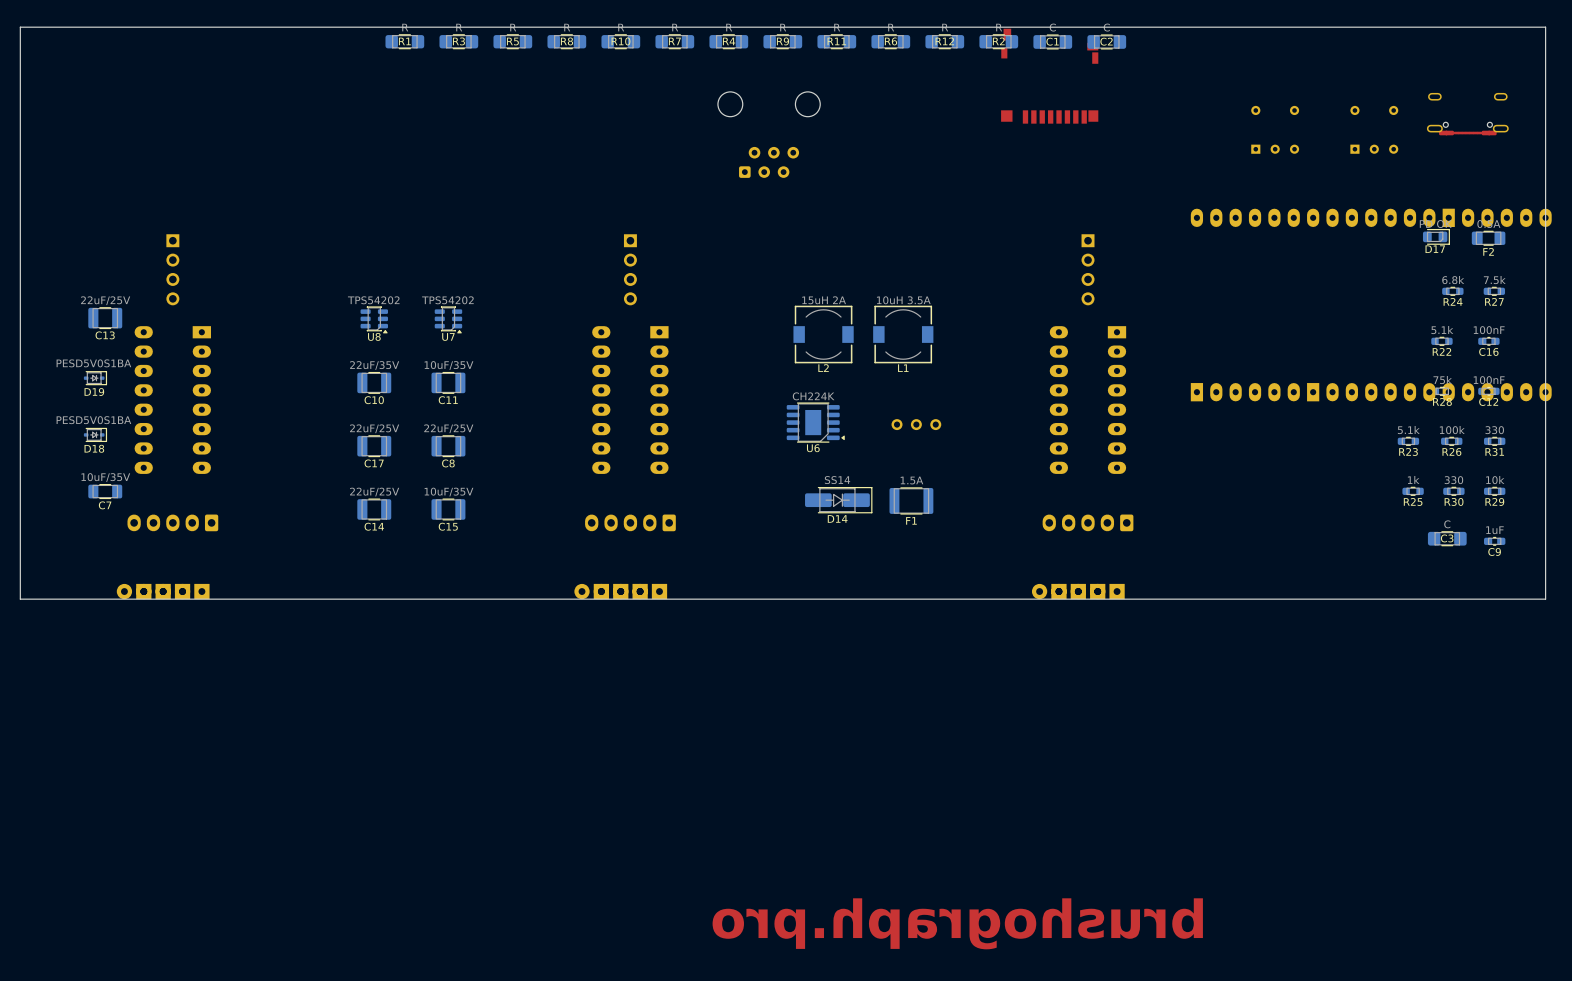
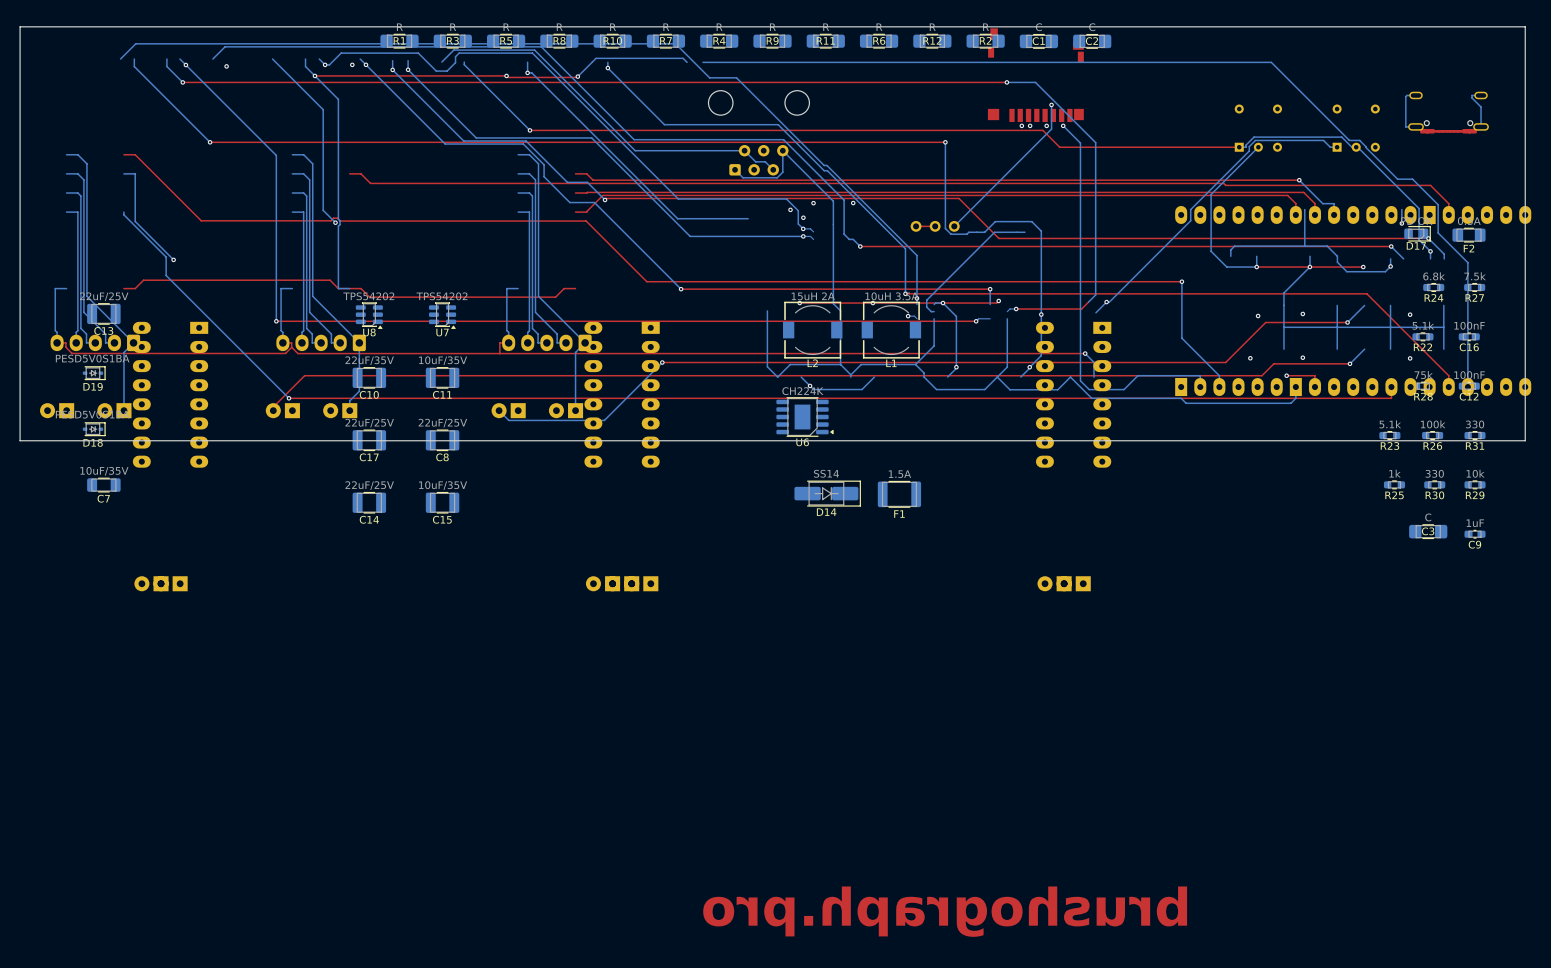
bottom track: none -> (120, 59) (135, 43) (675, 43) (709, 77) (736, 77) (916, 255) (916, 304)
bottom track: none -> (134, 59) (134, 66) (210, 142)
bottom track: none -> (166, 59) (166, 66) (182, 82)
bottom track: none -> (179, 59) (276, 155) (276, 321)
bottom track: none -> (212, 59) (225, 46) (541, 46) (634, 139) (783, 139) (844, 200) (844, 234) (860, 246)
bottom track: none -> (272, 59) (323, 109) (323, 210) (335, 222)
bottom track: none -> (305, 59) (305, 66) (338, 99) (338, 219) (340, 220) (338, 226) (338, 288) (349, 288)
bottom track: none -> (319, 59) (325, 64) (329, 64) (341, 53) (418, 53) (436, 71) (447, 71) (455, 62) (455, 56) (459, 53) (532, 53) (678, 198) (786, 198) (798, 210) (798, 223) (803, 228) (810, 228) (813, 231)
bottom track: none -> (360, 59) (445, 144) (523, 144) (544, 164) (544, 176) (569, 202) (594, 202) (681, 289)
bottom track: none -> (392, 60) (392, 69) (463, 141) (526, 141) (567, 182) (587, 182) (605, 199)
bottom track: none -> (408, 60) (408, 69) (476, 137) (591, 137) (690, 236) (810, 236) (813, 239)
bottom track: none -> (441, 62) (453, 50) (534, 50) (635, 150) (744, 150) (755, 161) (765, 161) (773, 169)
bottom track: none -> (464, 62) (464, 64) (529, 130)
bottom track: none -> (527, 62) (527, 72) (531, 72) (677, 218) (748, 218)
bottom track: none -> (607, 62) (607, 68) (664, 124) (778, 124) (905, 248) (905, 293)
bottom track: none -> (687, 62) (683, 58) (596, 58) (577, 76)
bottom track: none -> (702, 62) (1271, 62) (1349, 140) (1359, 140) (1397, 179) (1412, 179) (1438, 204) (1438, 232) (1467, 262) (1467, 387)
via: none -> (185, 65)
via: none -> (325, 64)
via: none -> (352, 64)
via: none -> (366, 64)
via: none -> (226, 66)
via: none -> (607, 68)
via: none -> (392, 69)
via: none -> (408, 69)
via: none -> (527, 72)
top track: none -> (314, 75) (577, 76)
via: none -> (314, 75)
via: none -> (506, 75)
via: none -> (577, 76)
via: none -> (182, 82)
bottom track: none -> (1006, 82) (1035, 82) (1095, 142) (1095, 294) (1088, 302)
top track: none -> (1006, 82) (182, 82)
via: none -> (1006, 82)
bottom track: none -> (1416, 95) (1405, 96) (1405, 126) (1416, 126)
bottom track: none -> (1481, 95) (1471, 95) (1471, 97) (1481, 107) (1481, 126)
bottom track: none -> (1051, 104) (1051, 129) (954, 226)
via: none -> (1051, 104)
via: none -> (1021, 125)
via: none -> (1030, 125)
via: none -> (1046, 125)
bottom track: none -> (1063, 125) (1080, 143) (1080, 380) (1089, 389) (1124, 389) (1137, 375) (1200, 375) (1200, 387)
via: none -> (1063, 125)
top track: none -> (529, 130) (1042, 130) (1059, 147) (1239, 147)
via: none -> (529, 130)
via: none -> (210, 142)
bottom track: none -> (945, 142) (945, 228) (951, 234) (984, 232) (995, 221) (1031, 221) (1041, 231) (1041, 355) (1020, 377)
top track: none -> (945, 142) (210, 142)
via: none -> (945, 142)
bottom track: none -> (1239, 147) (1246, 147) (1254, 137) (1341, 137) (1351, 147) (1357, 147) (1419, 208) (1419, 239) (1430, 251) (1430, 258)
bottom track: none -> (1258, 147) (1211, 194) (1211, 251) (1226, 267) (1256, 267) (1256, 256)
bottom track: none -> (1337, 147) (1330, 147) (1323, 140) (1255, 140) (1249, 146) (1249, 150) (1190, 209) (1190, 220) (1109, 302) (1106, 302) (1095, 312)
bottom track: none -> (66, 154) (77, 154) (86, 163) (86, 296) (133, 342) (124, 352) (124, 410)
top track: none -> (123, 154) (135, 154) (201, 220) (330, 220) (337, 218) (340, 221) (586, 221) (646, 281) (1181, 281)
bottom track: none -> (292, 154) (303, 154) (312, 163) (312, 296) (359, 342) (359, 391) (349, 400) (349, 410)
bottom track: none -> (518, 154) (529, 154) (538, 163) (538, 296) (585, 342) (575, 352) (575, 410)
bottom track: none -> (735, 169) (743, 177) (777, 177) (782, 172) (782, 150) (833, 201) (833, 303) (840, 310) (840, 364)
bottom track: none -> (66, 173) (77, 173) (83, 179) (83, 312) (105, 334) (105, 342) (114, 342)
bottom track: none -> (123, 173) (135, 173) (135, 221) (173, 259)
bottom track: none -> (292, 173) (303, 173) (309, 179) (309, 312) (331, 334) (331, 342) (340, 342)
top track: none -> (349, 173) (361, 173) (370, 183) (1223, 183) (1225, 185) (1430, 185) (1448, 203) (1448, 214)
bottom track: none -> (518, 173) (529, 173) (535, 179) (535, 312) (557, 334) (557, 342) (565, 342)
top track: none -> (575, 173) (586, 173) (593, 180) (1299, 180)
bottom track: none -> (1299, 180) (1322, 203) (1334, 203) (1334, 214)
via: none -> (1299, 180)
bottom track: none -> (66, 193) (77, 193) (80, 196) (80, 328) (86, 334) (86, 342) (95, 342)
bottom track: none -> (292, 193) (303, 193) (306, 196) (306, 328) (312, 334) (312, 342) (321, 342)
bottom track: none -> (518, 193) (529, 193) (532, 196) (532, 328) (538, 334) (538, 342) (546, 342)
top track: none -> (575, 193) (1303, 192) (1314, 203) (1314, 214)
top track: none -> (605, 199) (958, 198) (998, 238) (1428, 238)
via: none -> (605, 199)
via: none -> (813, 203)
via: none -> (853, 203)
via: none -> (790, 209)
bottom track: none -> (1304, 209) (1304, 246)
bottom track: none -> (1401, 209) (1401, 223)
bottom track: none -> (66, 212) (77, 212) (77, 330) (76, 342)
bottom track: none -> (123, 212) (123, 214) (166, 257) (166, 275) (288, 398)
bottom track: none -> (292, 212) (303, 212) (303, 330) (301, 342)
bottom track: none -> (518, 212) (529, 212) (529, 330) (527, 342)
top track: none -> (575, 212) (586, 212) (602, 195) (1287, 195) (1295, 203) (1295, 214)
via: none -> (803, 217)
via: none -> (335, 222)
via: none -> (1401, 223)
top track: none -> (935, 226) (916, 226)
part: none -> (935, 226)
via: none -> (803, 228)
bottom track: none -> (1024, 232) (994, 232) (926, 300) (926, 307) (934, 311)
via: none -> (803, 236)
bottom track: none -> (1428, 238) (1444, 254) (1444, 258)
via: none -> (1428, 238)
via: none -> (860, 246)
bottom track: none -> (1391, 246) (1403, 258)
top track: none -> (1391, 246) (860, 246)
via: none -> (1391, 246)
via: none -> (1430, 251)
bottom track: none -> (1230, 256) (1230, 249) (1234, 246) (1327, 246) (1337, 256) (1337, 262) (1346, 271) (1385, 271) (1390, 266) (1390, 258)
bottom track: none -> (1310, 256) (1310, 266) (1283, 292) (1283, 349)
via: none -> (173, 259)
part: (172, 269) -> none
part: (630, 269) -> none
part: (1088, 269) -> none
via: none -> (1256, 267)
via: none -> (1309, 267)
top track: none -> (1363, 267) (1256, 267)
via: none -> (1363, 267)
via: none -> (1390, 266)
bottom track: none -> (1181, 281) (1181, 338) (1219, 375) (1219, 387)
via: none -> (1181, 281)
bottom track: none -> (66, 288) (55, 288) (57, 342)
bottom track: none -> (292, 288) (281, 288) (282, 342)
bottom track: none -> (518, 288) (506, 288) (508, 342)
top track: none -> (575, 288) (564, 288) (555, 297) (369, 297) (361, 288) (338, 288) (330, 280) (143, 280) (135, 288) (123, 288)
via: none -> (681, 289)
bottom track: none -> (990, 289) (990, 304)
top track: none -> (990, 289) (681, 289)
via: none -> (990, 289)
top track: none -> (905, 293) (1366, 293) (1448, 375) (1448, 387)
via: none -> (905, 293)
via: none -> (916, 298)
top track: none -> (998, 300) (996, 303) (799, 303)
via: none -> (998, 300)
top track: none -> (1088, 302) (1081, 309) (1016, 309)
via: none -> (1106, 302)
via: none -> (799, 303)
via: none -> (872, 303)
via: none -> (942, 303)
bottom track: none -> (934, 304) (942, 303) (956, 316) (956, 368) (947, 377)
bottom track: none -> (1337, 305) (1337, 349)
bottom track: none -> (1364, 305) (1347, 322)
bottom track: none -> (1390, 305) (1390, 349)
bottom track: none -> (1443, 305) (1443, 349)
bottom track: none -> (1016, 309) (1009, 309) (1007, 311)
via: none -> (1016, 309)
bottom track: none -> (767, 310) (767, 366) (777, 377) (790, 364) (840, 364)
via: none -> (1041, 314)
via: none -> (1302, 313)
via: none -> (1410, 314)
bottom track: none -> (908, 316) (914, 316) (916, 318)
via: none -> (908, 316)
via: none -> (1258, 316)
bottom track: none -> (934, 318) (934, 345) (915, 364)
bottom track: none -> (990, 318) (978, 318) (976, 321)
bottom track: none -> (1007, 318) (1007, 367) (984, 389) (936, 389) (924, 377) (924, 373) (915, 364)
via: none -> (276, 321)
top track: none -> (976, 321) (276, 321)
via: none -> (976, 321)
top track: none -> (1347, 322) (1265, 322) (1225, 362) (662, 362)
via: none -> (1347, 322)
bottom track: none -> (1443, 327) (1283, 327)
top track: none -> (57, 342) (65, 342) (65, 347) (72, 353) (285, 353) (291, 347)
part: none -> (95, 342)
top track: none -> (282, 342) (291, 342) (291, 347)
part: none -> (321, 342)
top track: none -> (508, 342) (499, 342) (499, 353)
part: none -> (546, 342)
top track: none -> (291, 347) (297, 353) (1085, 353)
bottom track: none -> (1364, 349) (1349, 363)
bottom track: none -> (1085, 353) (1094, 362) (1094, 377)
via: none -> (1085, 353)
via: none -> (1302, 357)
via: none -> (1250, 358)
via: none -> (1410, 358)
bottom track: none -> (662, 362) (604, 420) (508, 420) (499, 410)
via: none -> (662, 362)
top track: none -> (1349, 363) (1273, 363) (1261, 375) (304, 375) (273, 407) (273, 410)
via: none -> (1349, 363)
bottom track: none -> (840, 364) (850, 374)
bottom track: none -> (915, 364) (861, 364) (850, 374)
via: none -> (956, 367)
via: none -> (1029, 367)
bottom track: none -> (850, 374) (850, 377)
top track: none -> (1286, 375) (1314, 375) (1314, 387)
via: none -> (1286, 375)
bottom track: none -> (874, 377) (861, 389) (813, 389) (801, 377)
bottom track: none -> (997, 377) (1009, 389) (1057, 389) (1070, 377) (1091, 398) (1181, 398) (1186, 403) (1290, 403) (1295, 398) (1295, 387)
via: none -> (810, 385)
top track: none -> (1391, 387) (1391, 398) (288, 398)
via: none -> (288, 398)
part: none -> (57, 410)
part: none -> (114, 410)
part: none -> (282, 410)
part: none -> (340, 410)
part: none -> (508, 410)
part: none -> (565, 410)
part: (916, 424) -> none
board edge: (1545, 446) (1545, 599) (20, 599) (20, 446) -> (1525, 440) (20, 440)
part: (172, 522) -> none
part: (630, 522) -> none
part: (1088, 522) -> none
part: (134, 591) -> none
part: (192, 591) -> none
part: (591, 591) -> none
part: (1049, 591) -> none
part: (1107, 591) -> none

